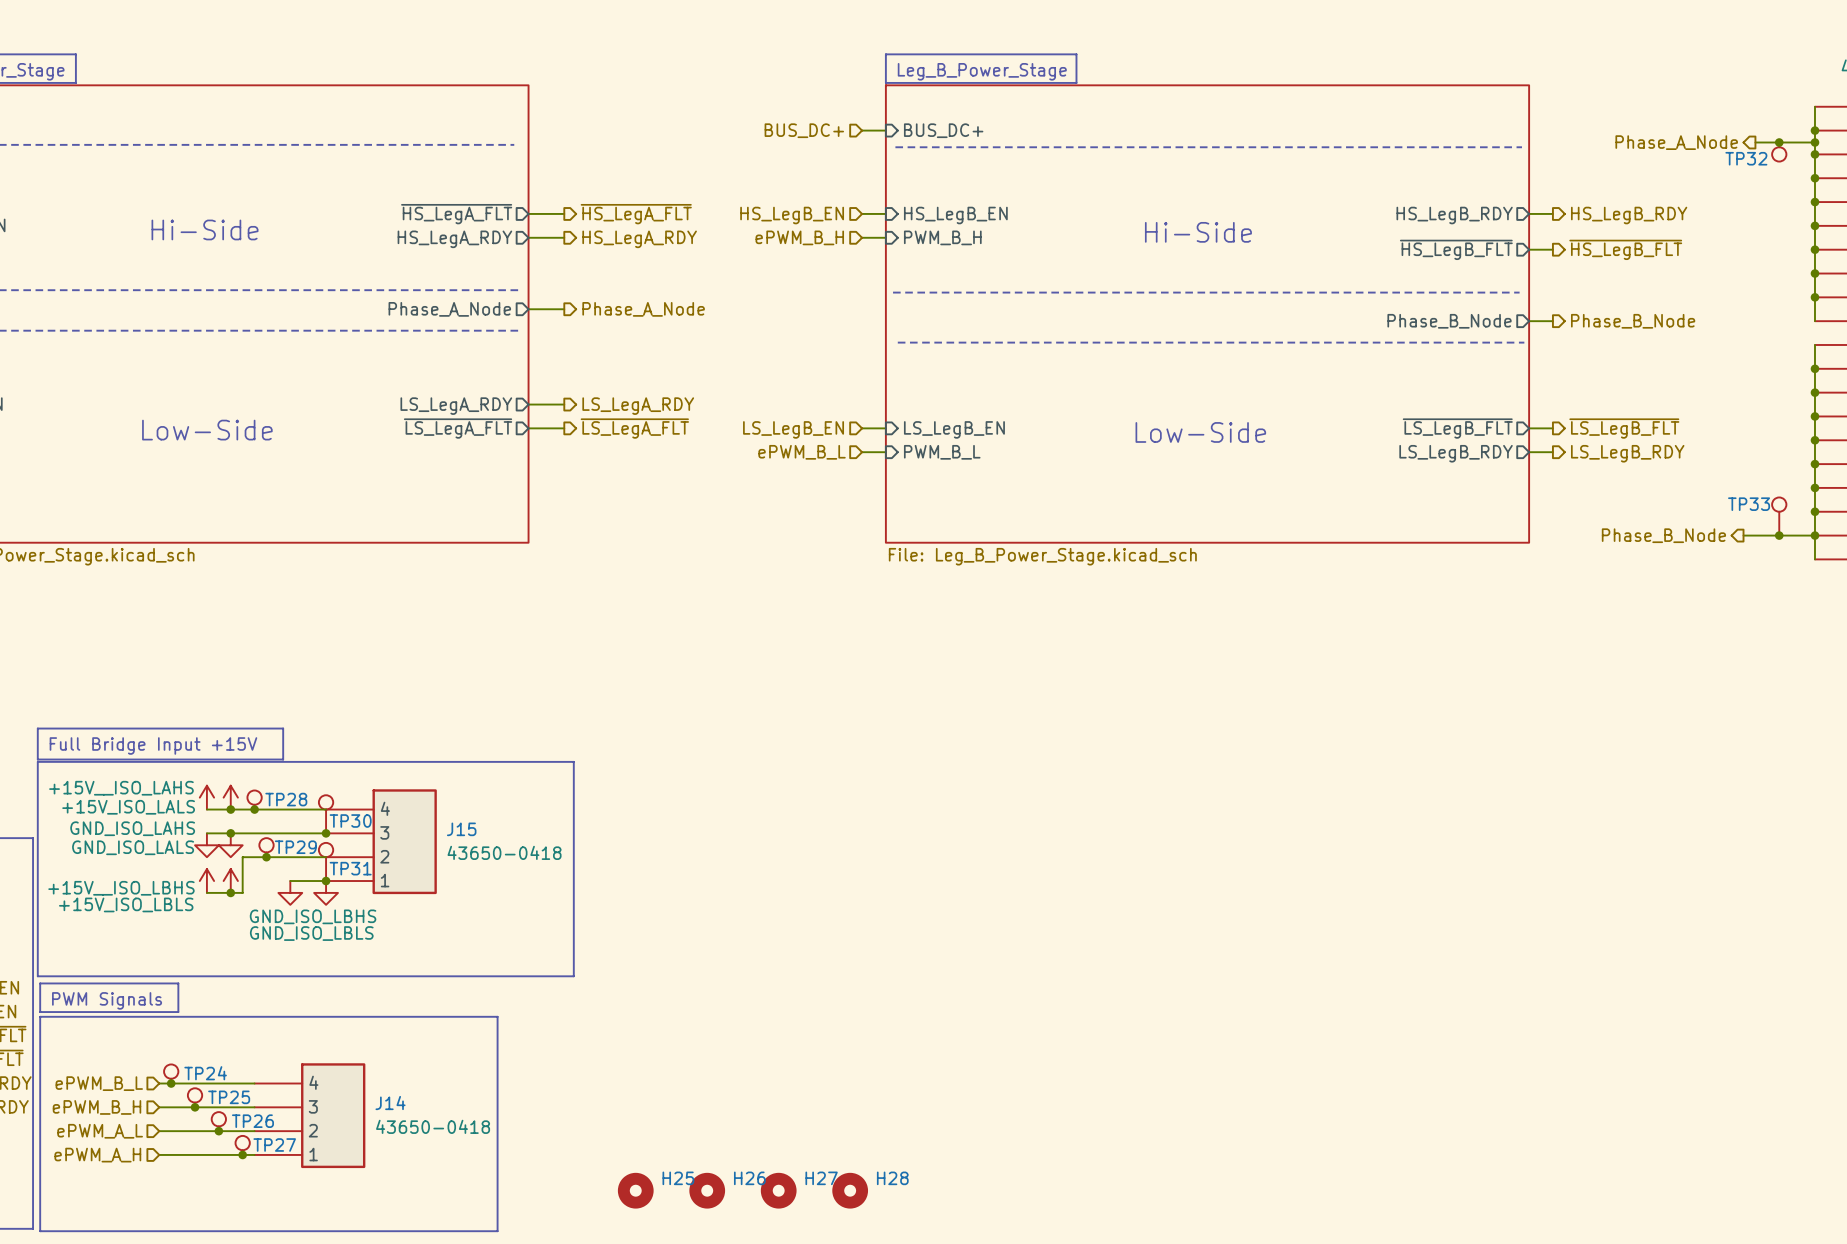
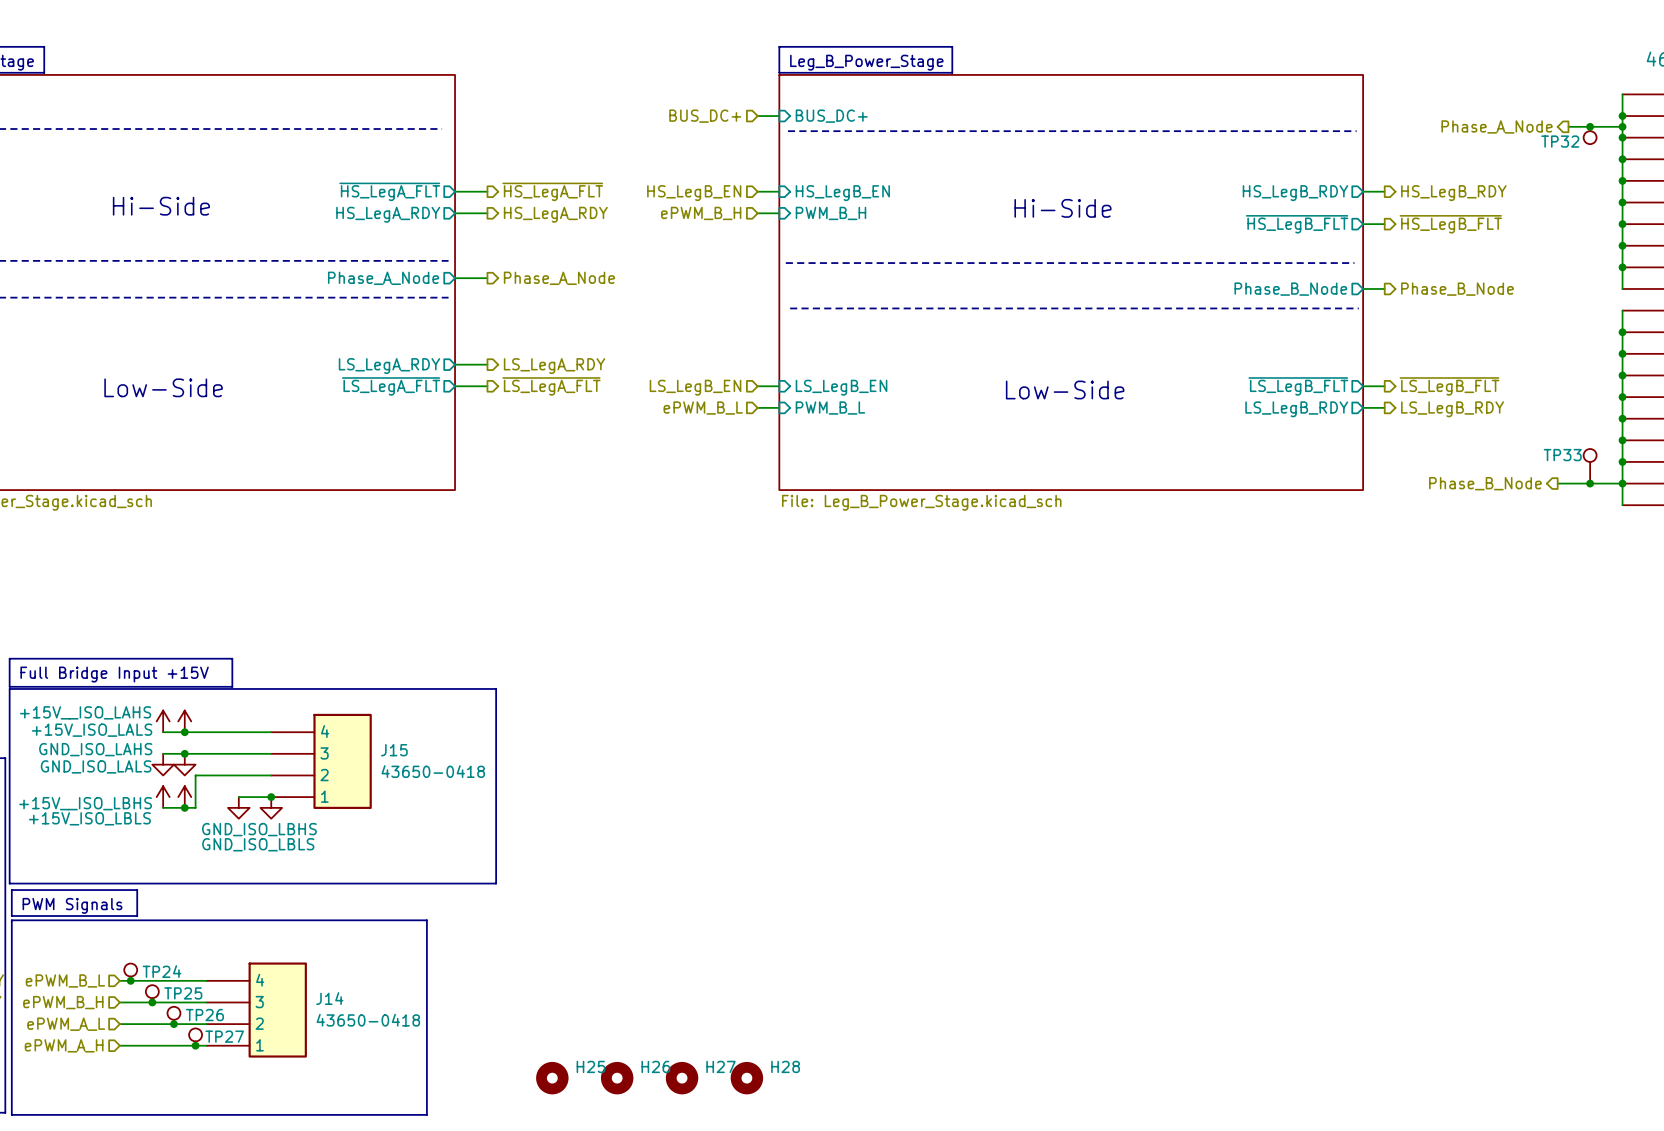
TP28: (254, 800) -> none
junction: (254, 809) -> none
TP30: (326, 814) -> none
junction: (326, 833) -> none
TP29: (266, 847) -> none
junction: (266, 857) -> none
TP31: (326, 861) -> none

